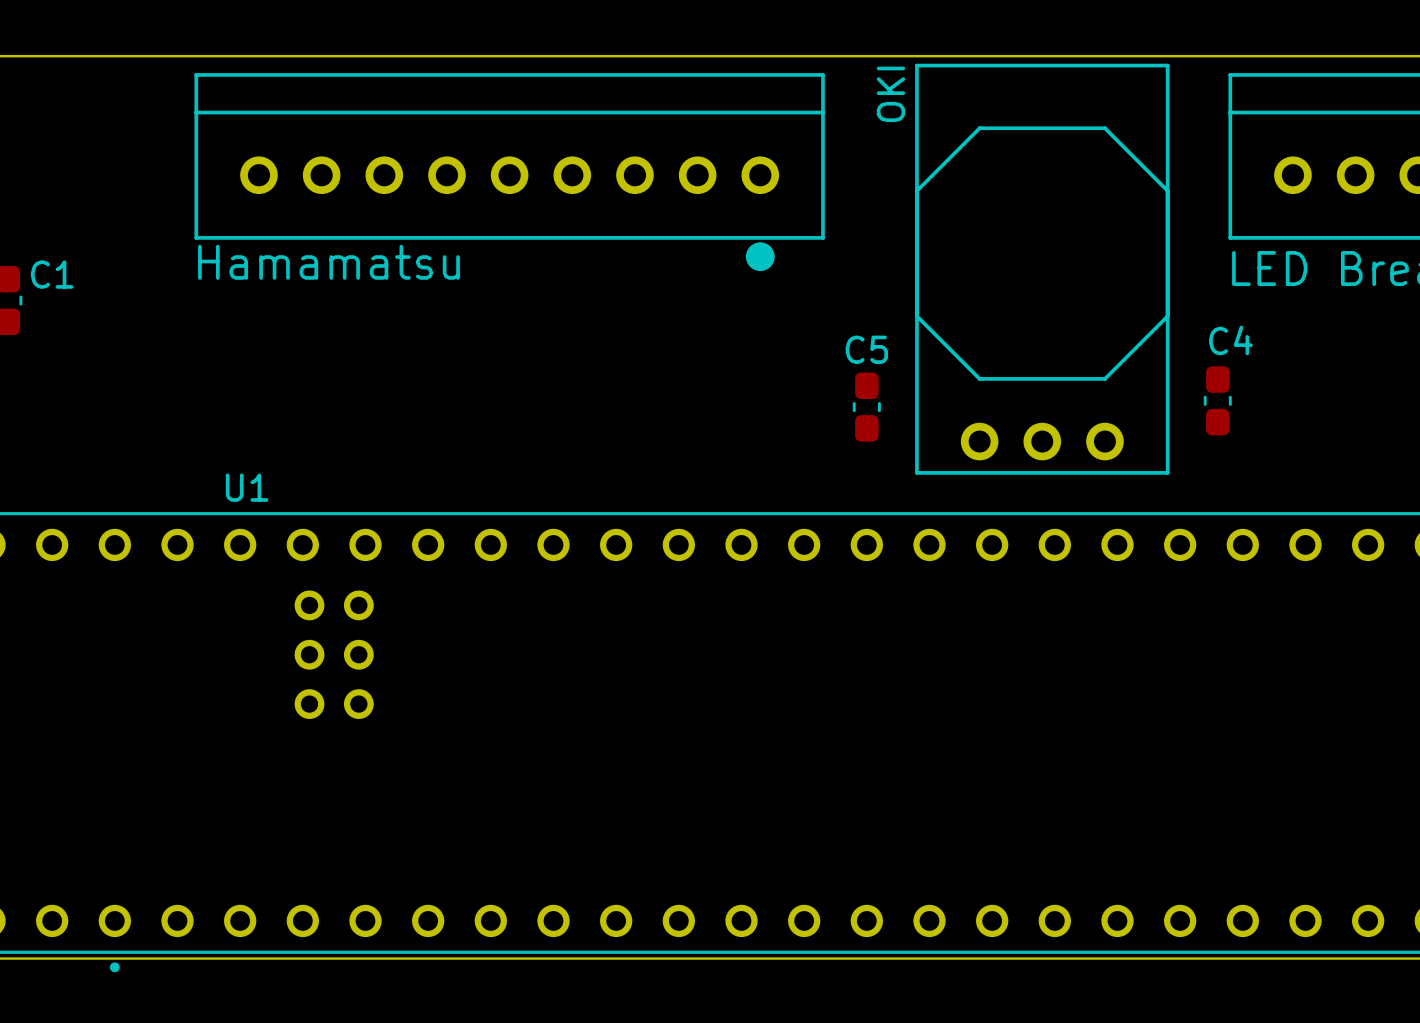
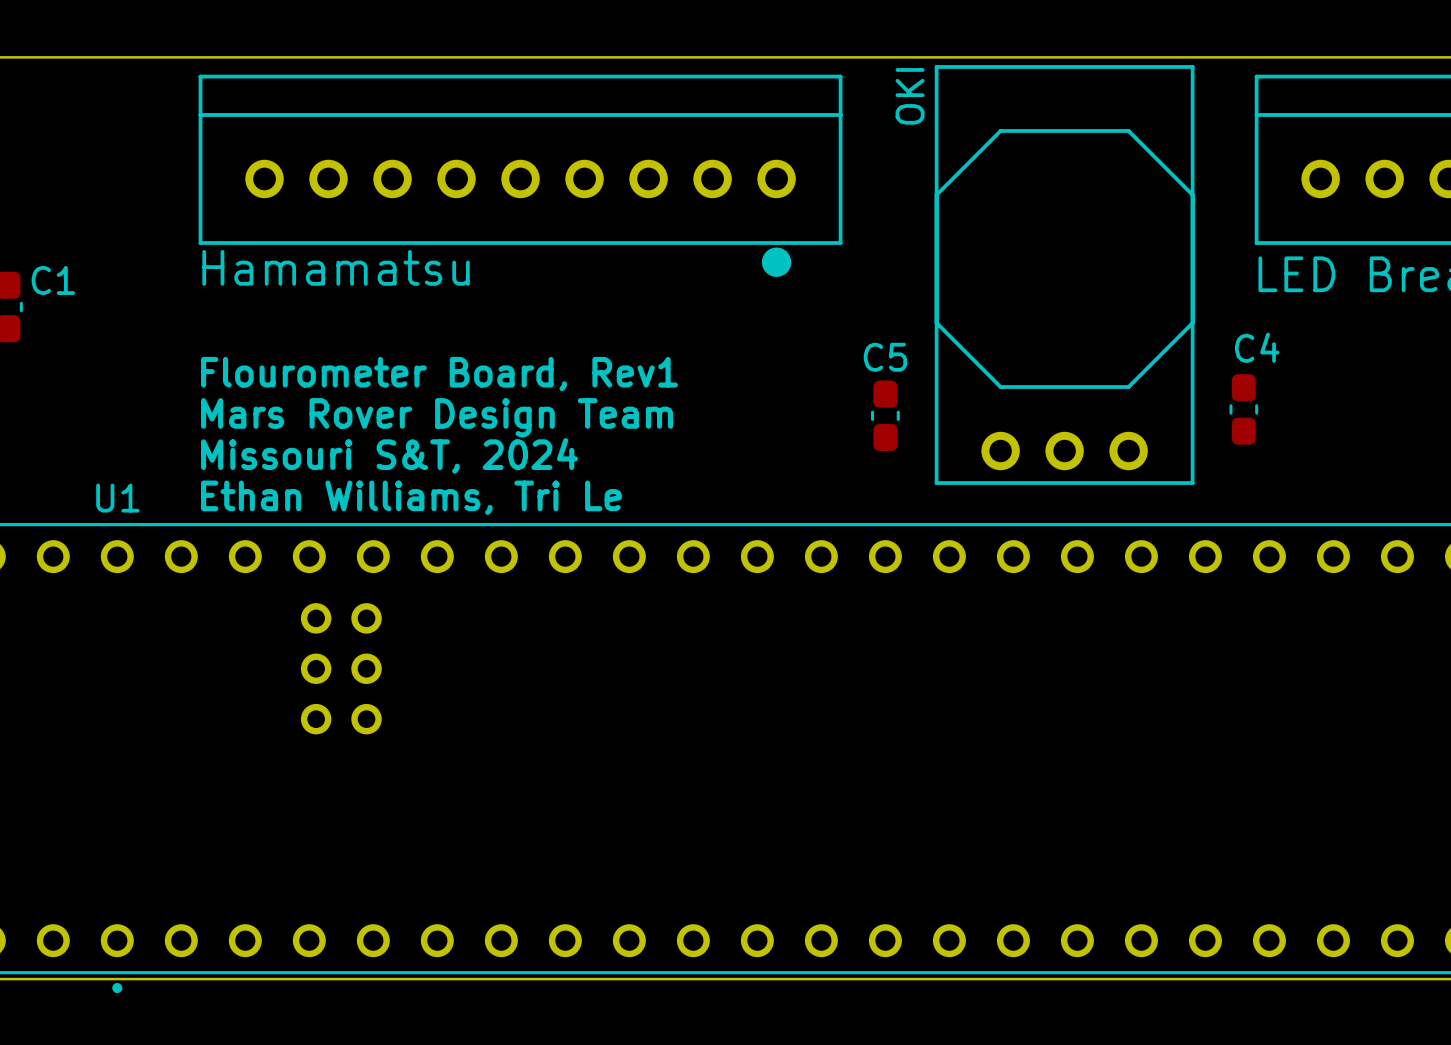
text: none -> Flourometer Board, Rev1 (439, 374)
text: none -> Mars Rover Design Team (437, 417)
text: none -> Missouri S&T, 2024 (389, 455)
U1 name position: U1 (247, 487) -> U1 (117, 498)
text: none -> Ethan Williams, Tri Le (411, 497)

